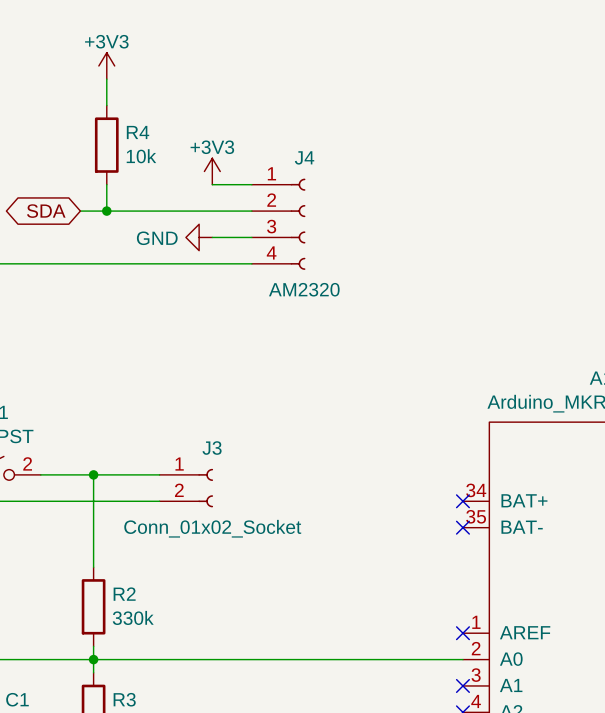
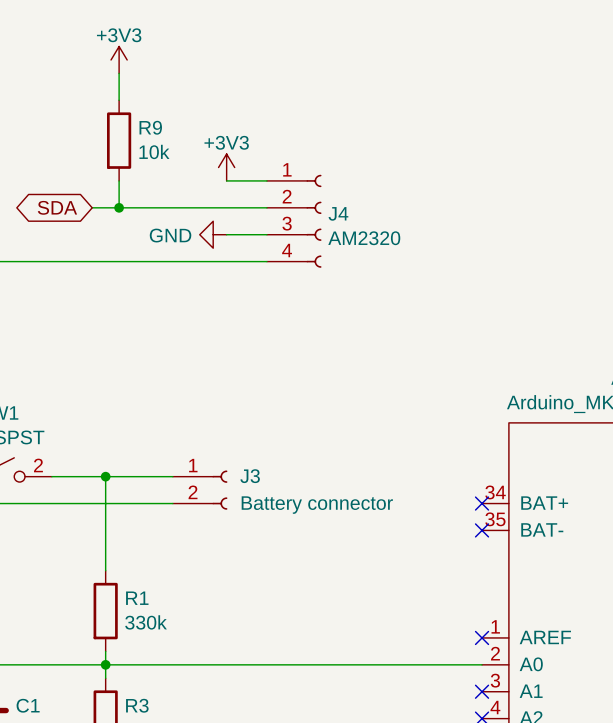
R4 name: R4 (138, 132) -> R9 (150, 127)
J4 name position: J4 (304, 157) -> J4 (338, 213)
J4 value position: AM2320 (304, 289) -> AM2320 (364, 238)
J3 name position: J3 (212, 448) -> J3 (250, 476)
J3 value: Conn_01x02_Socket (212, 528) -> Battery connector (317, 505)
R2 name: R2 (124, 594) -> R1 (137, 598)

